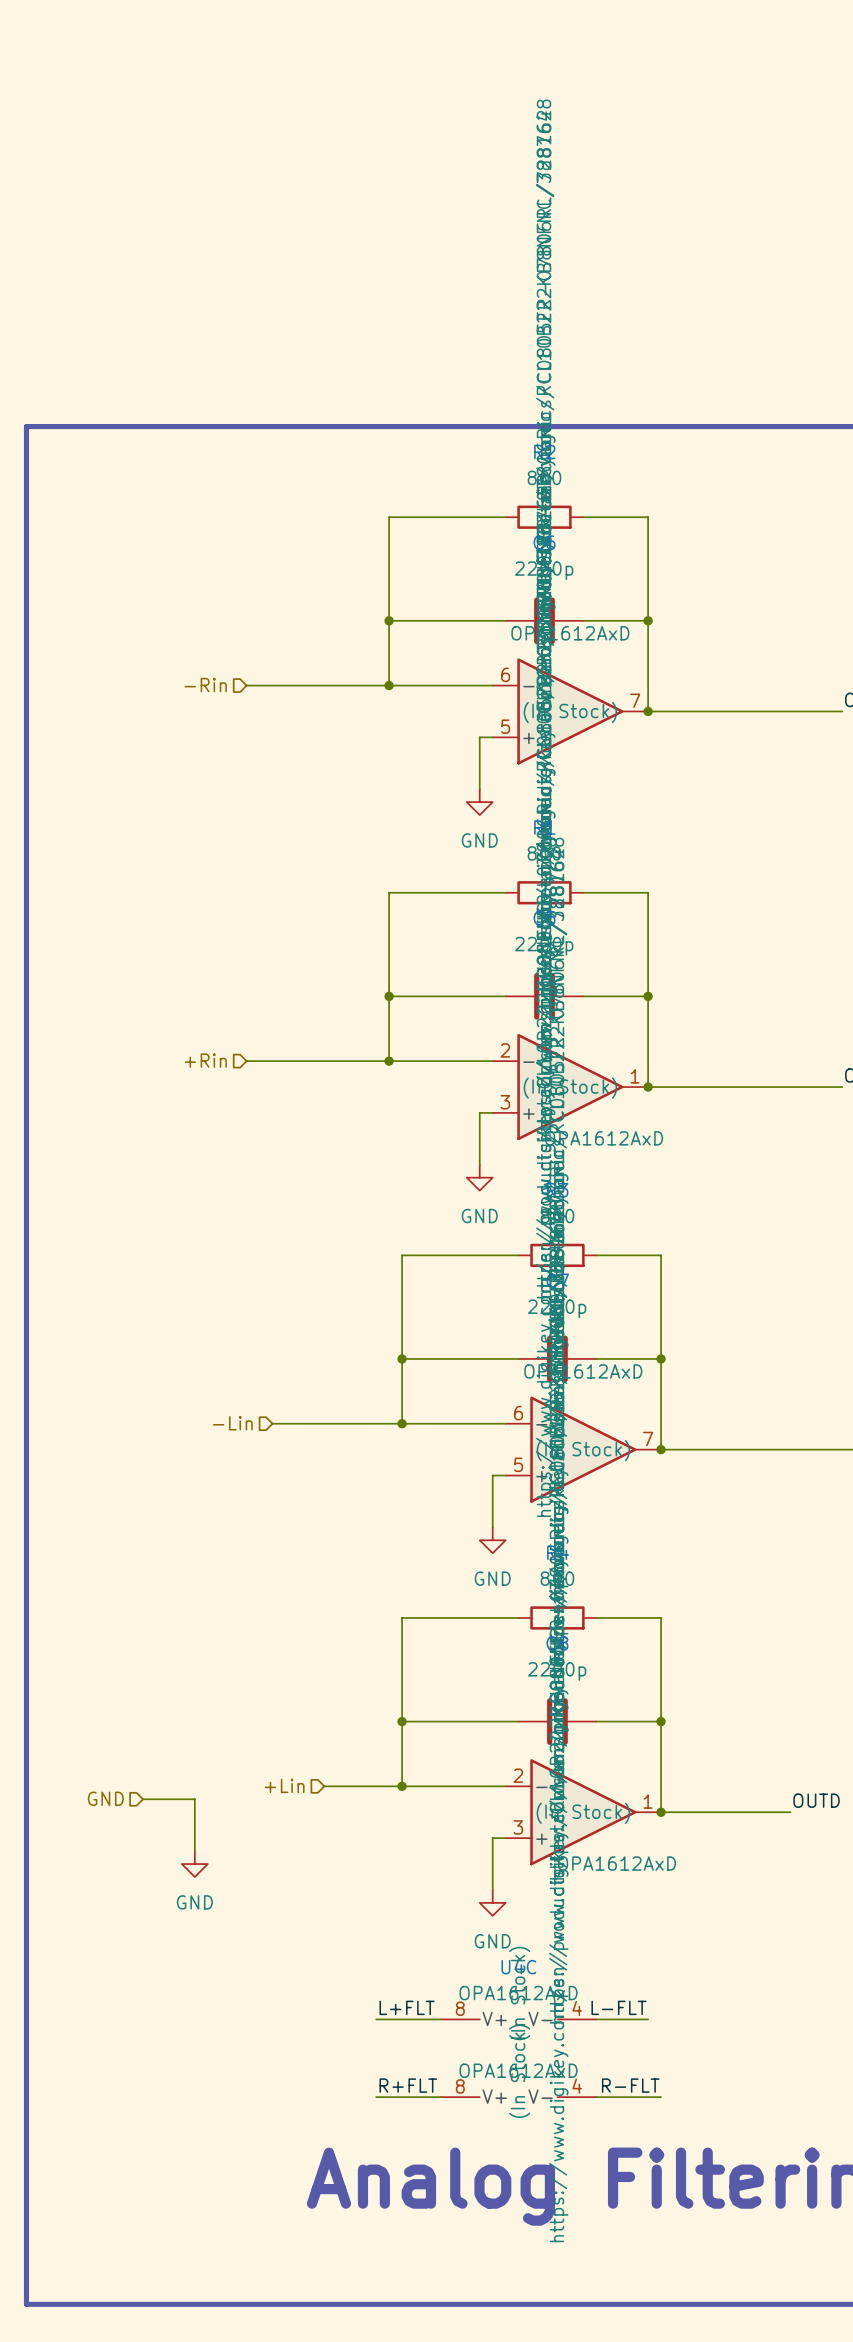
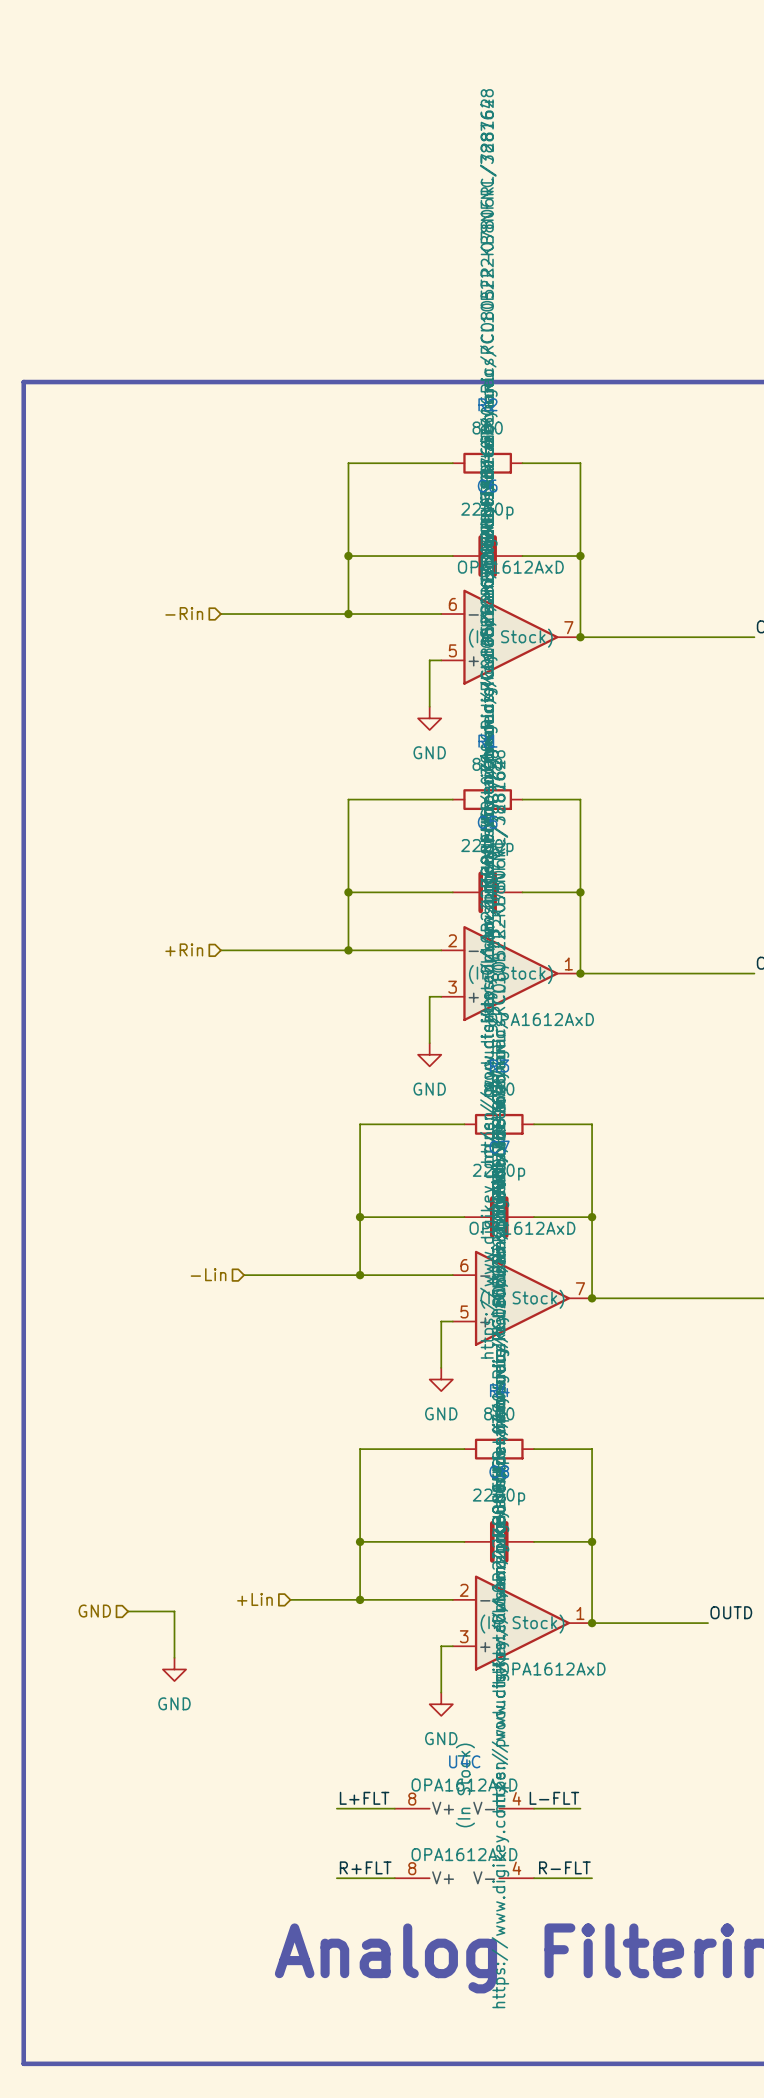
part text: (In Stock) (519, 2071) -> none

